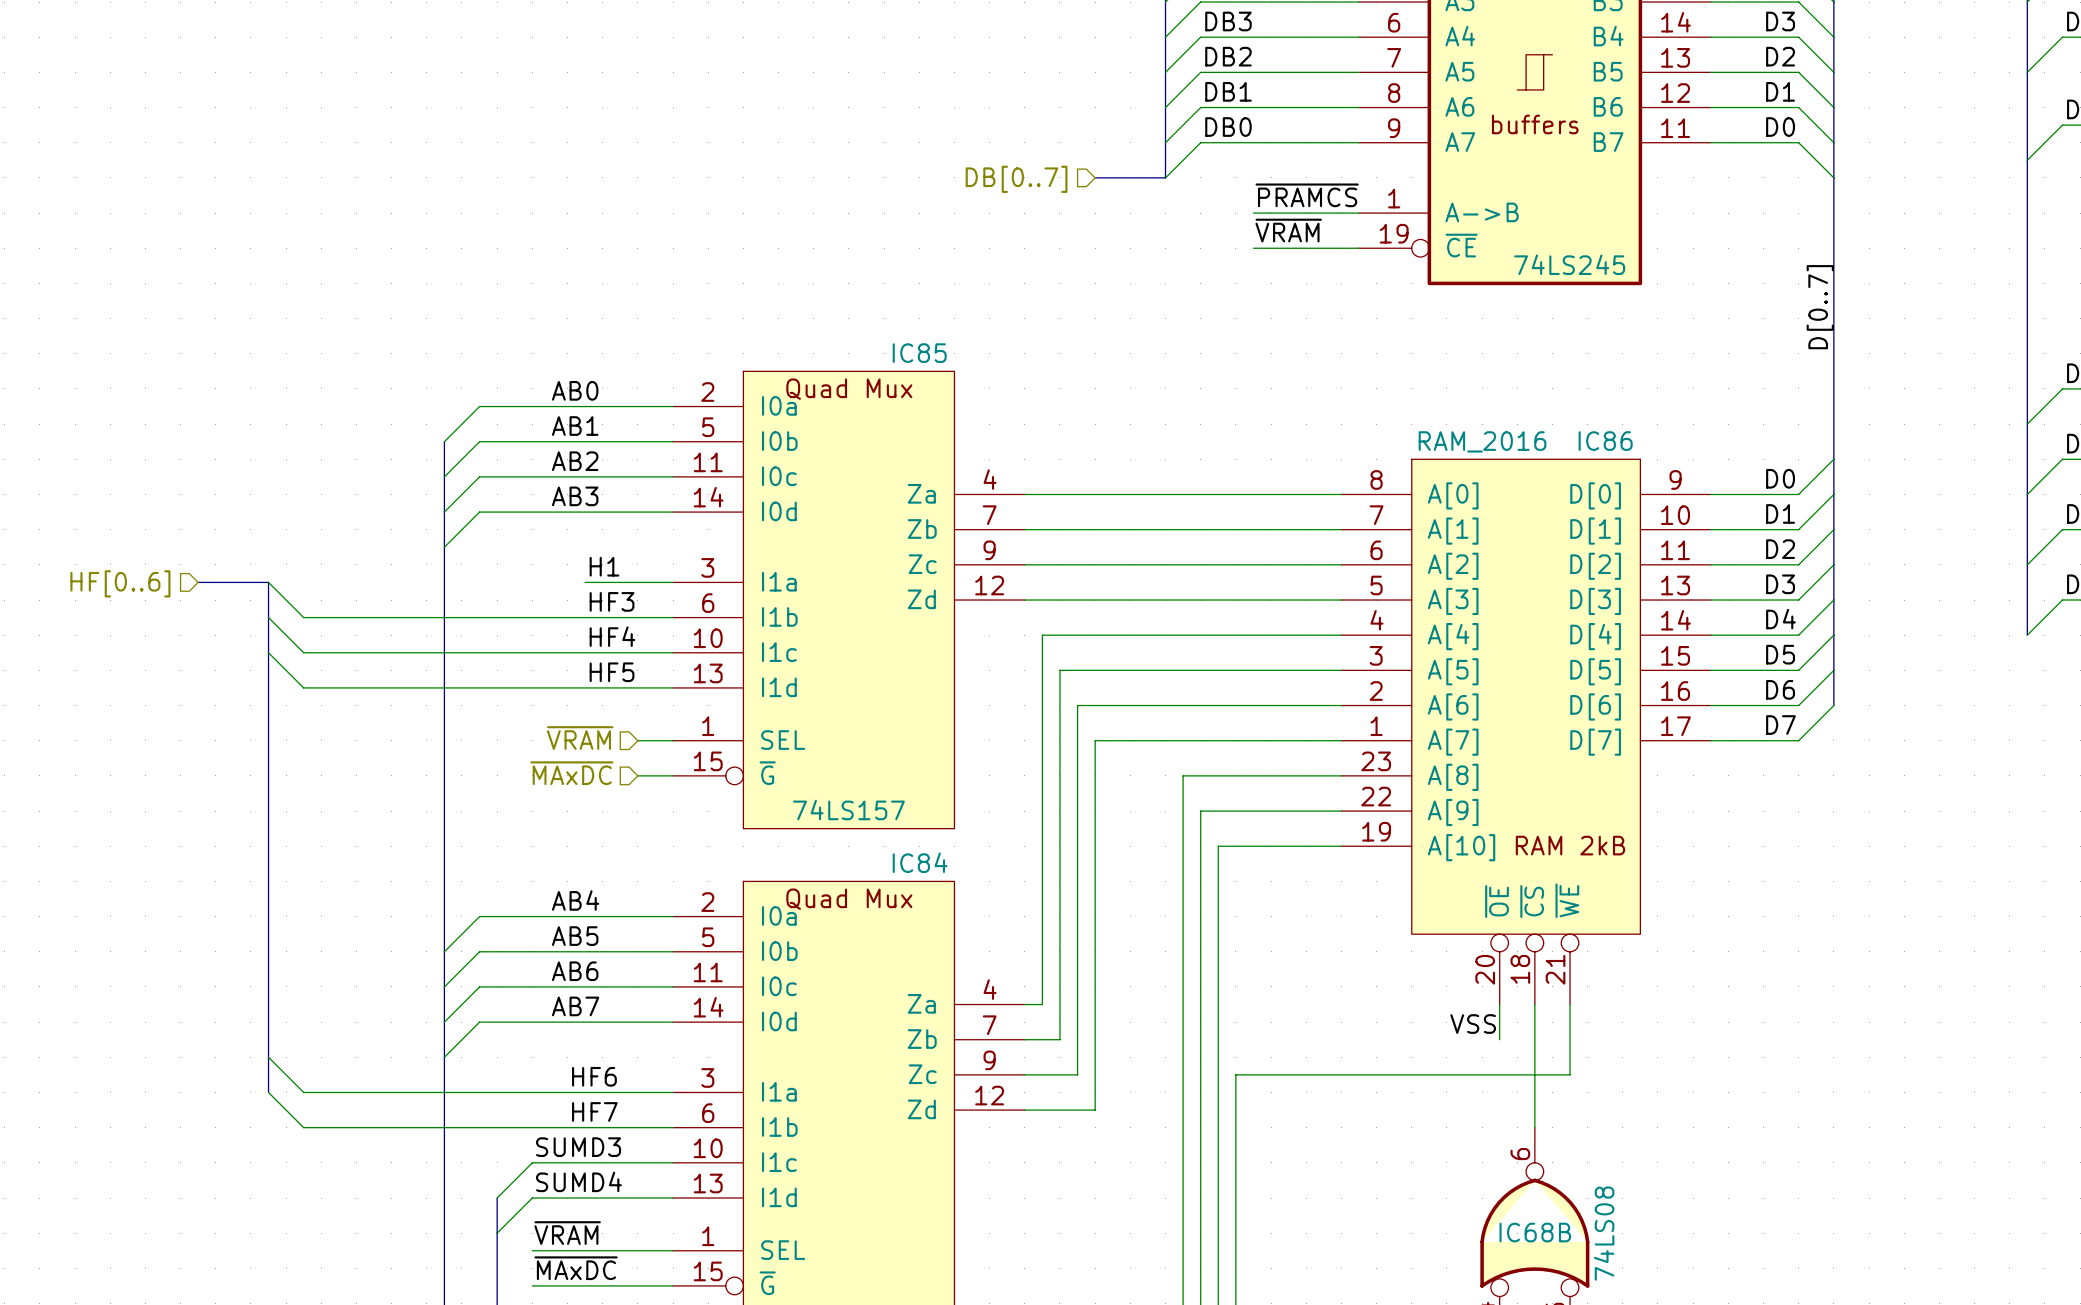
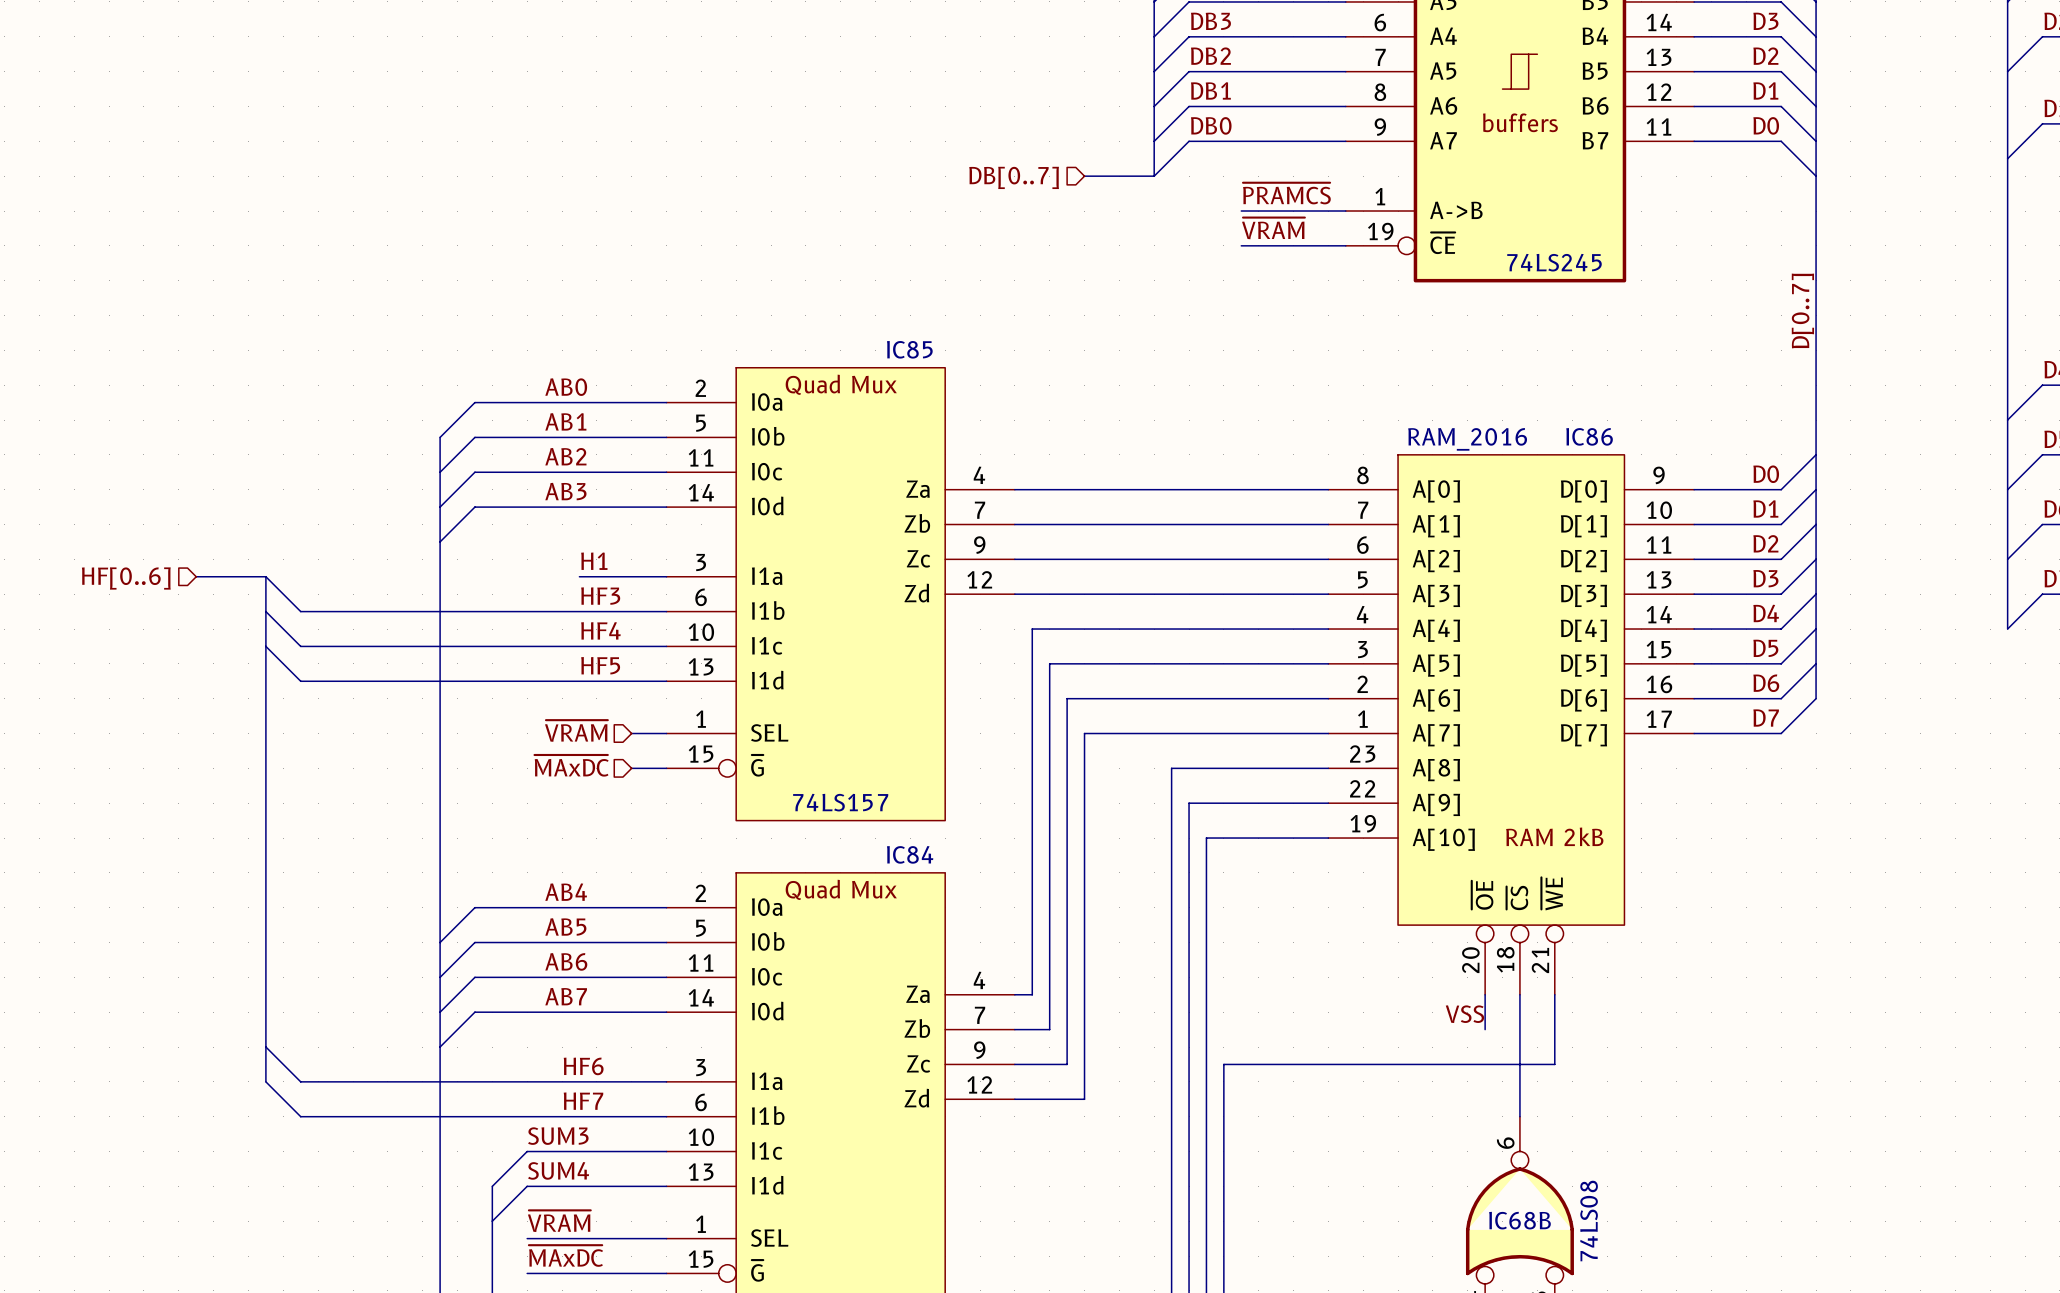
label: SUMD3 (578, 1147) -> SUM3 (558, 1136)
label: SUMD4 (578, 1181) -> SUM4 (558, 1170)

